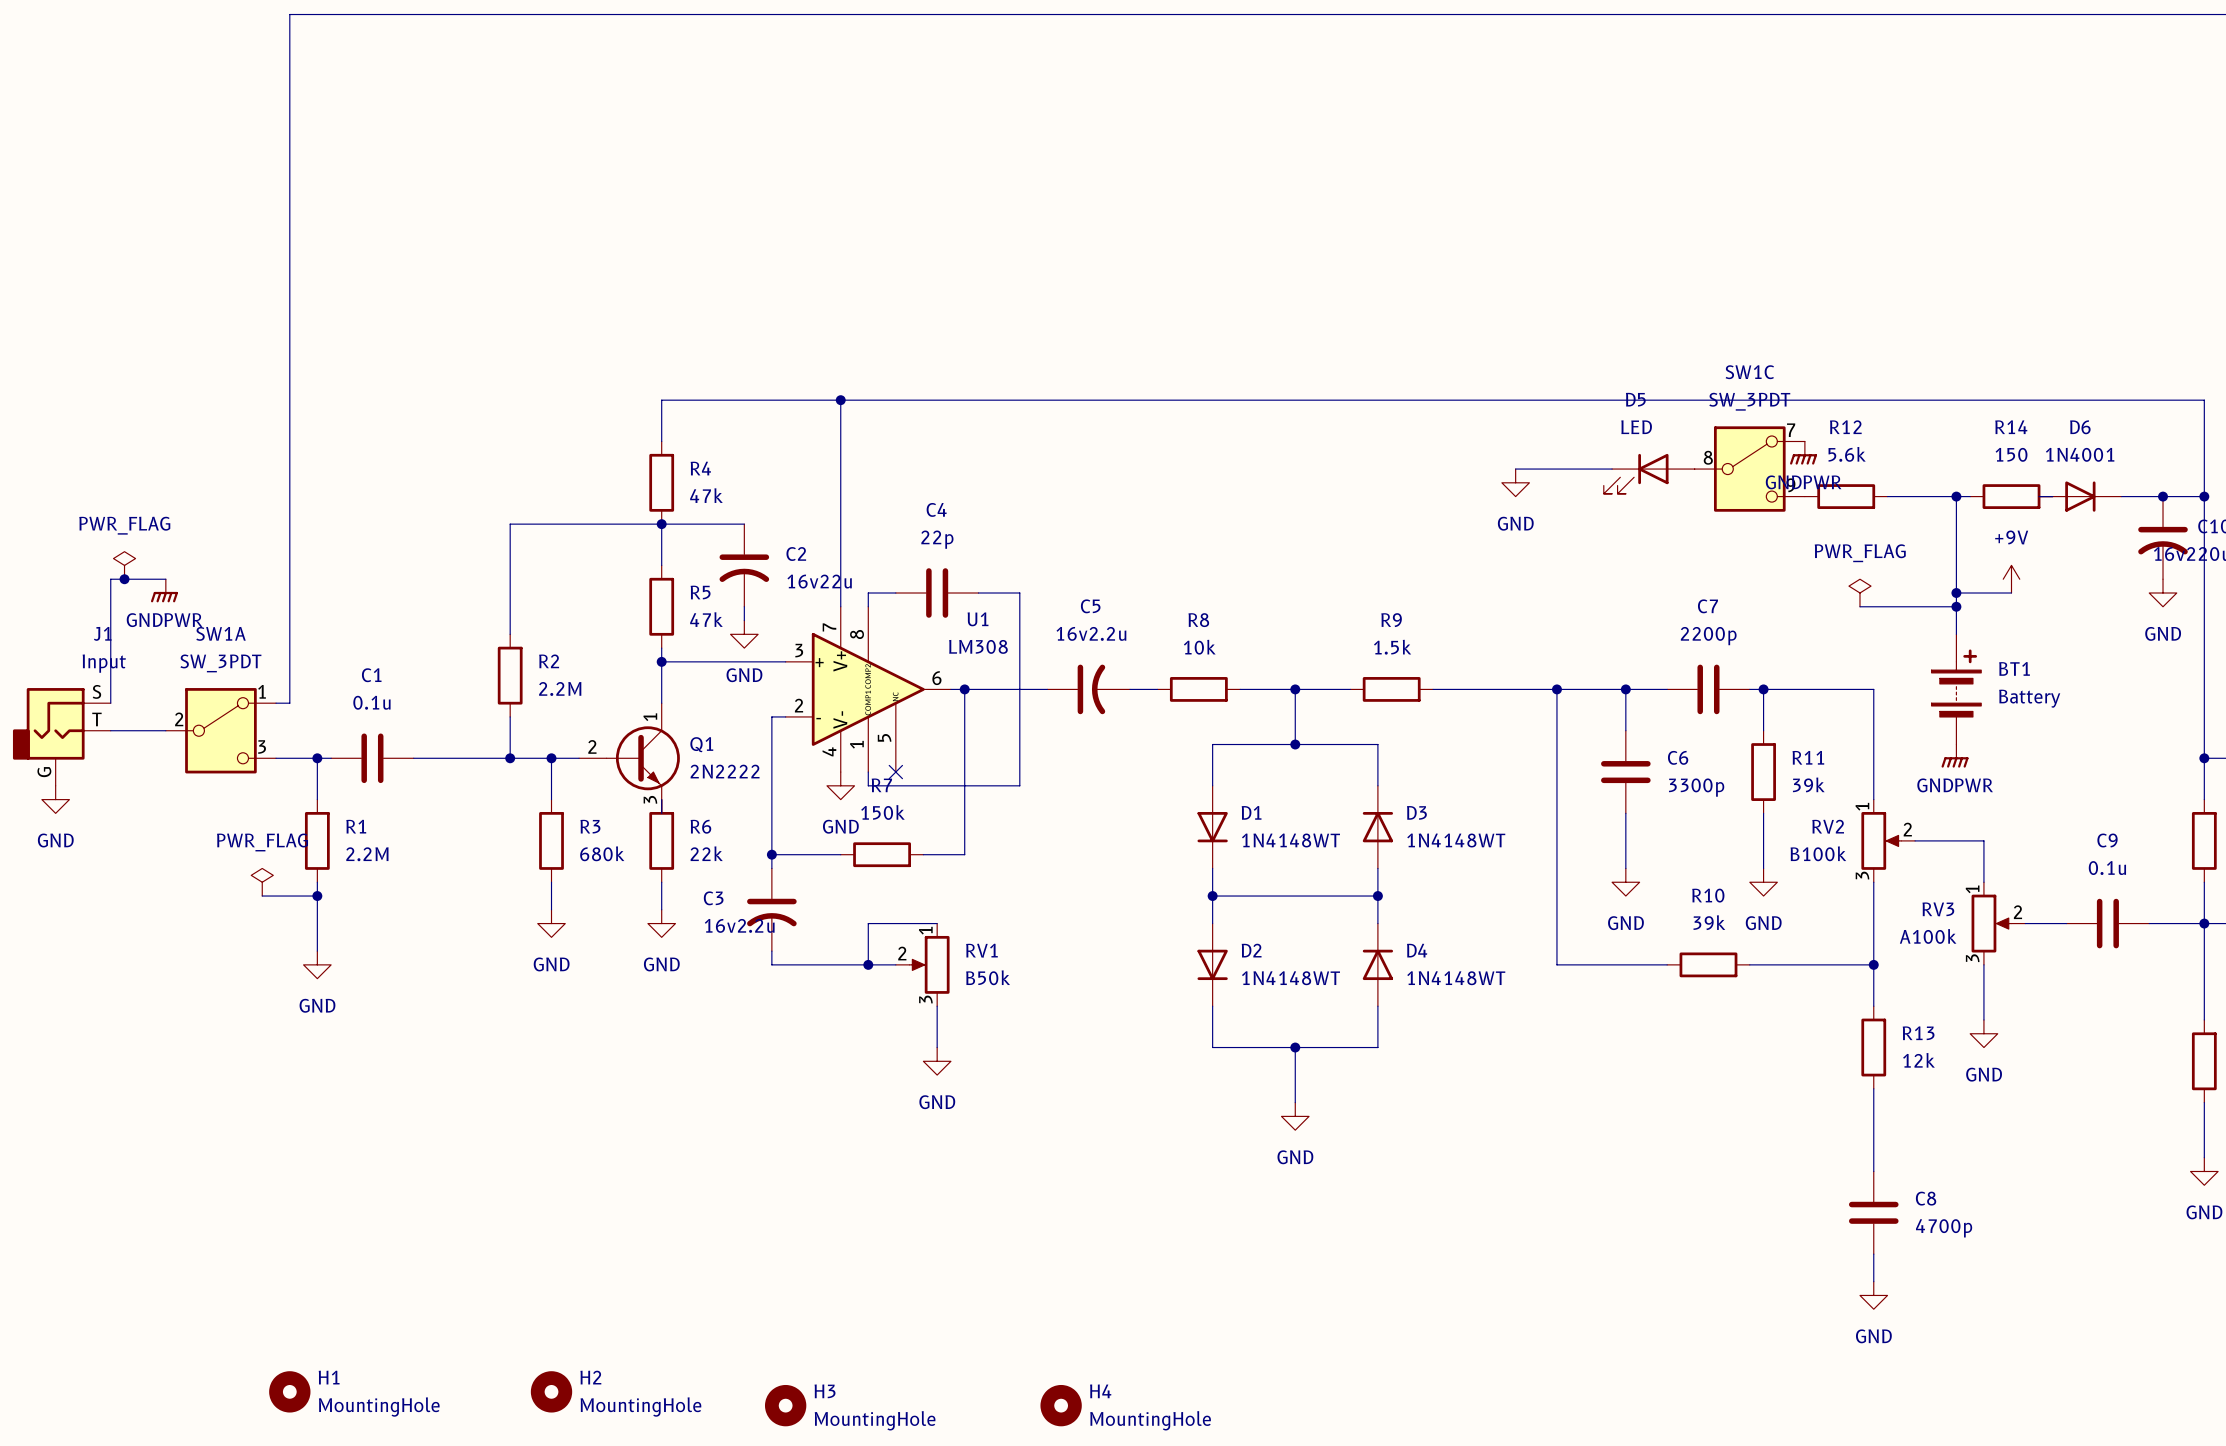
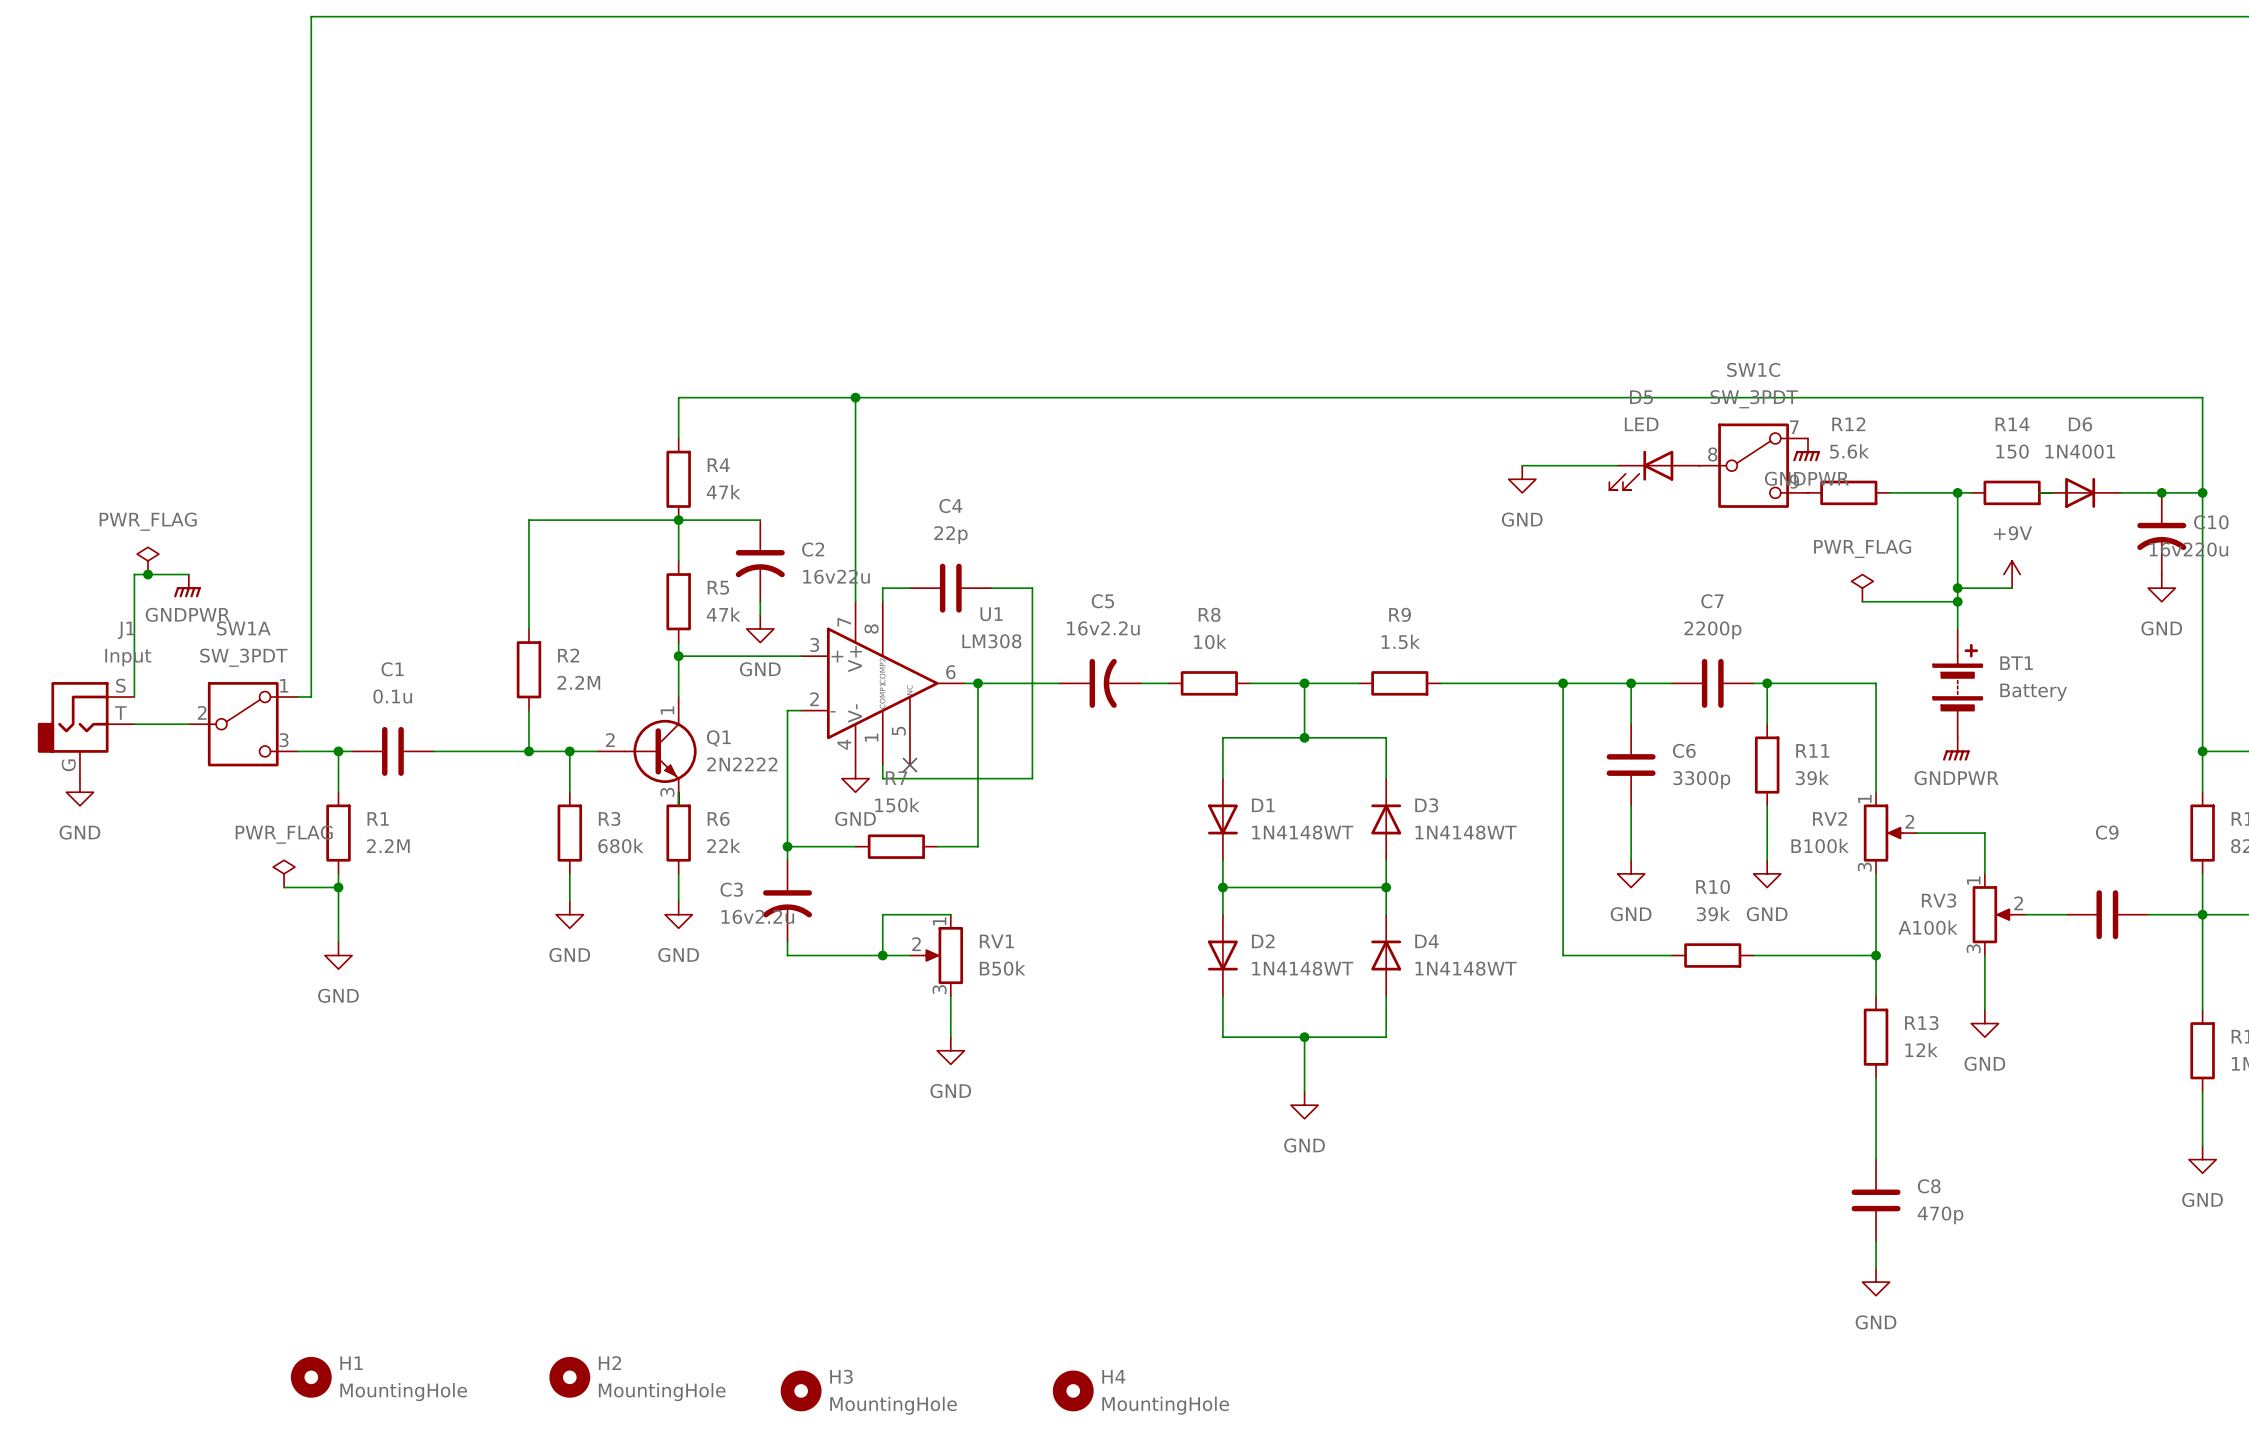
C9 value: 0.1u (2107, 868) -> none
C8 value: 4700p (1944, 1228) -> 470p (1940, 1215)

